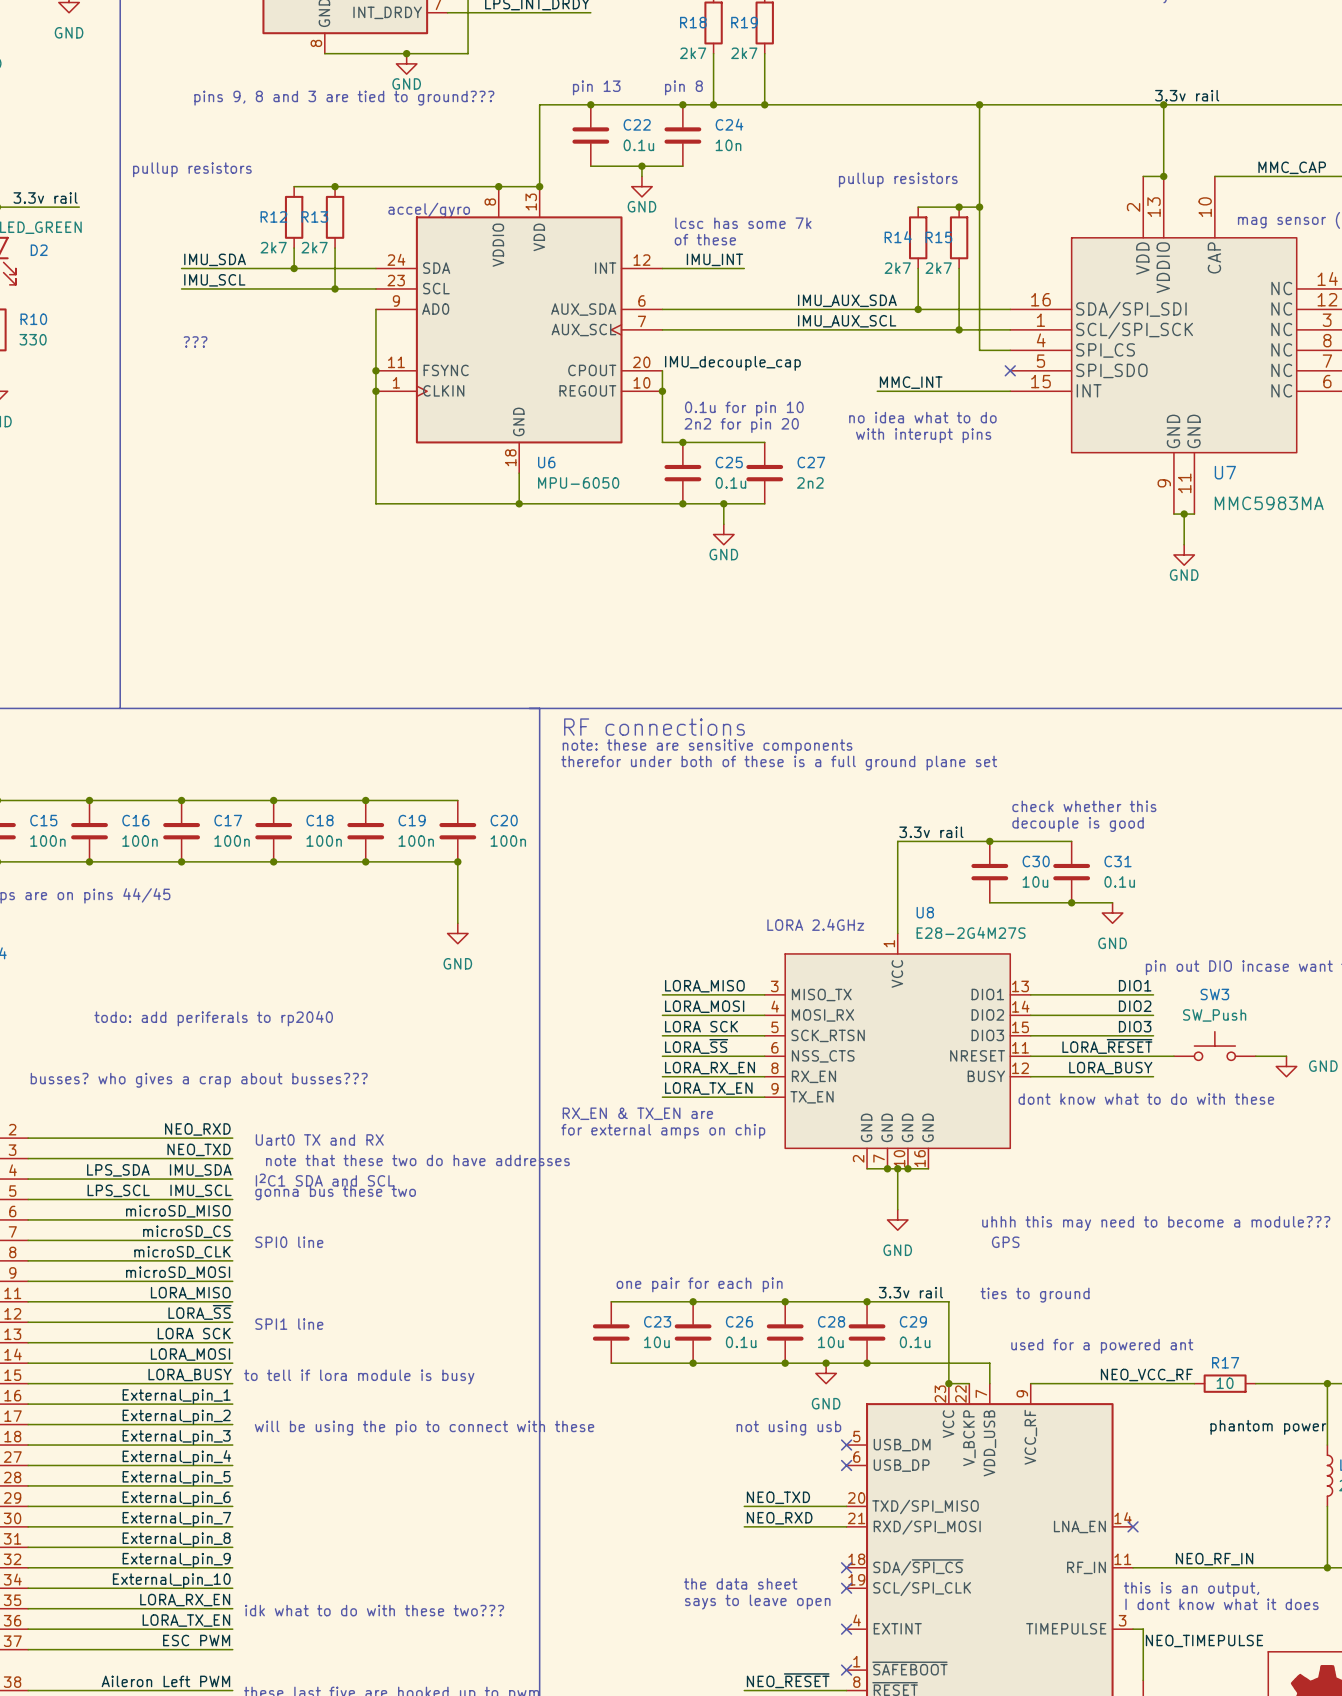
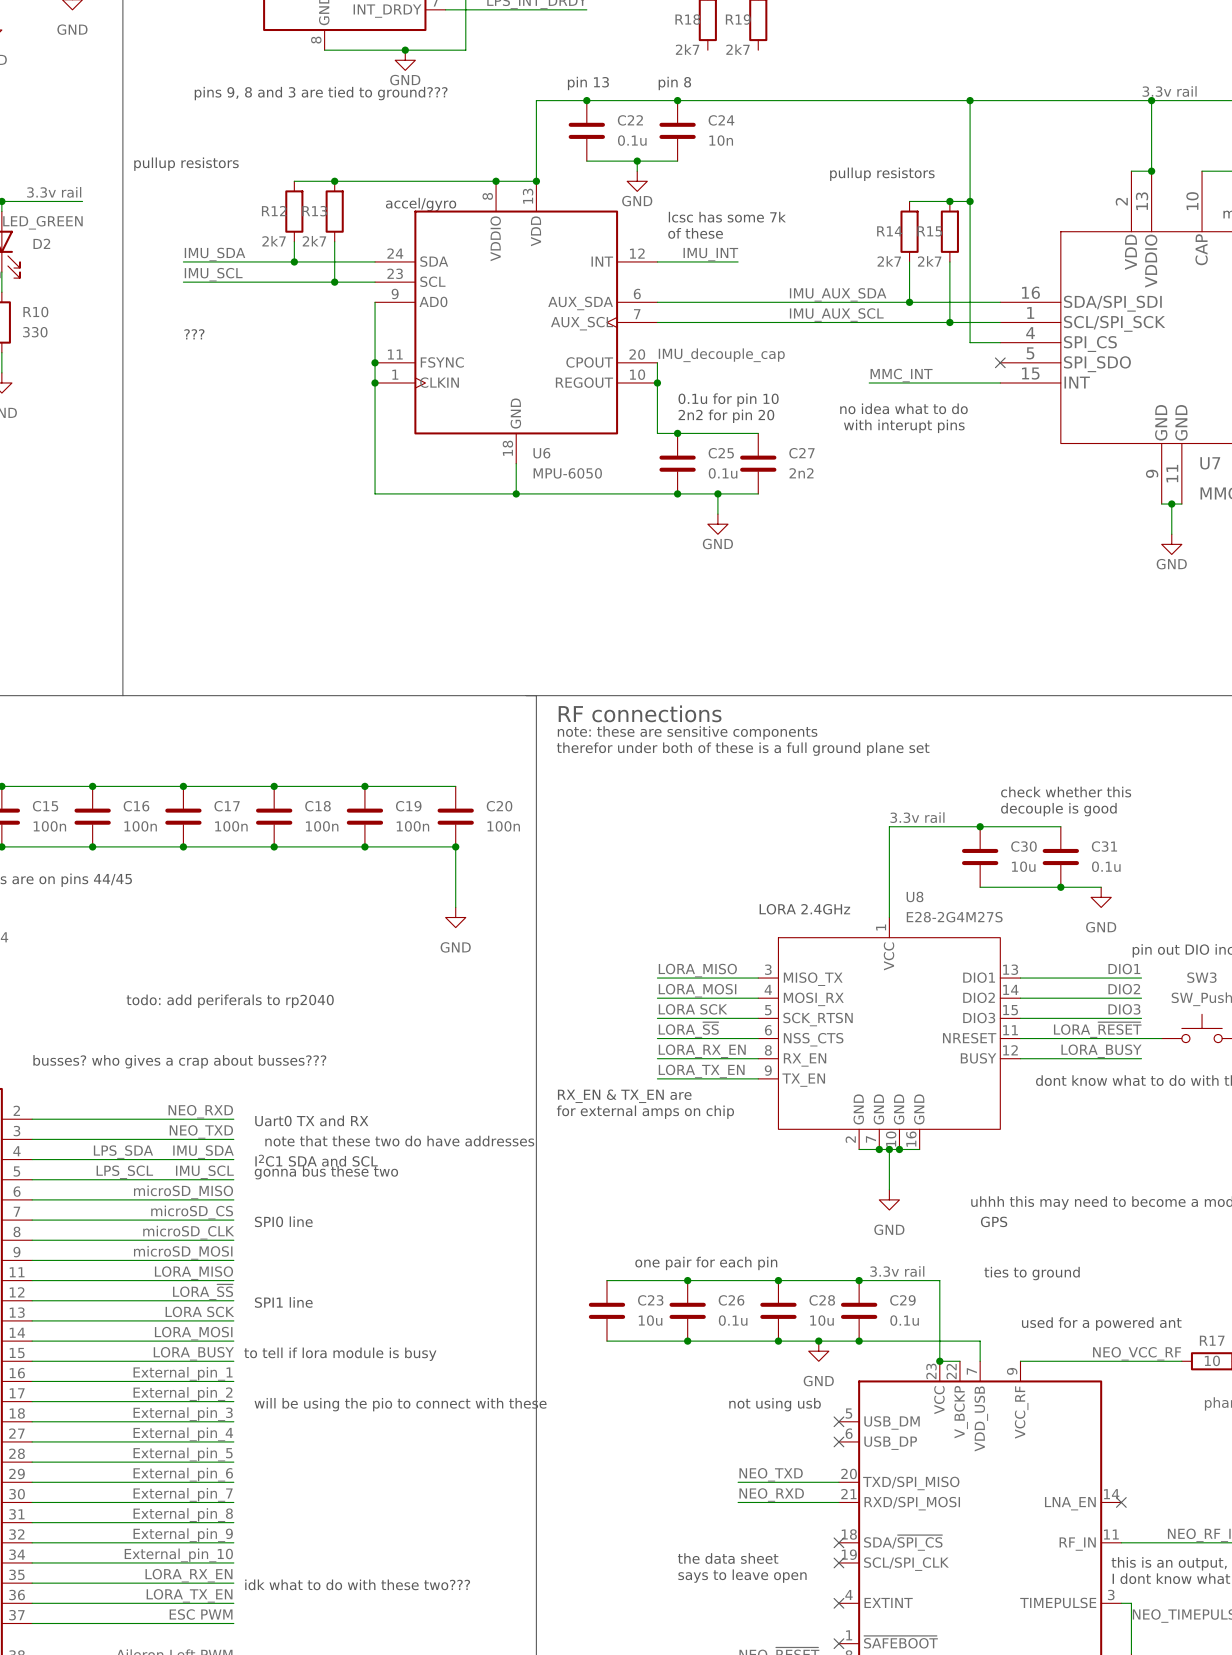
wire: (713, 53) (713, 104) -> none
wire: (764, 53) (764, 104) -> none
junction: (713, 104) -> none
junction: (764, 104) -> none

